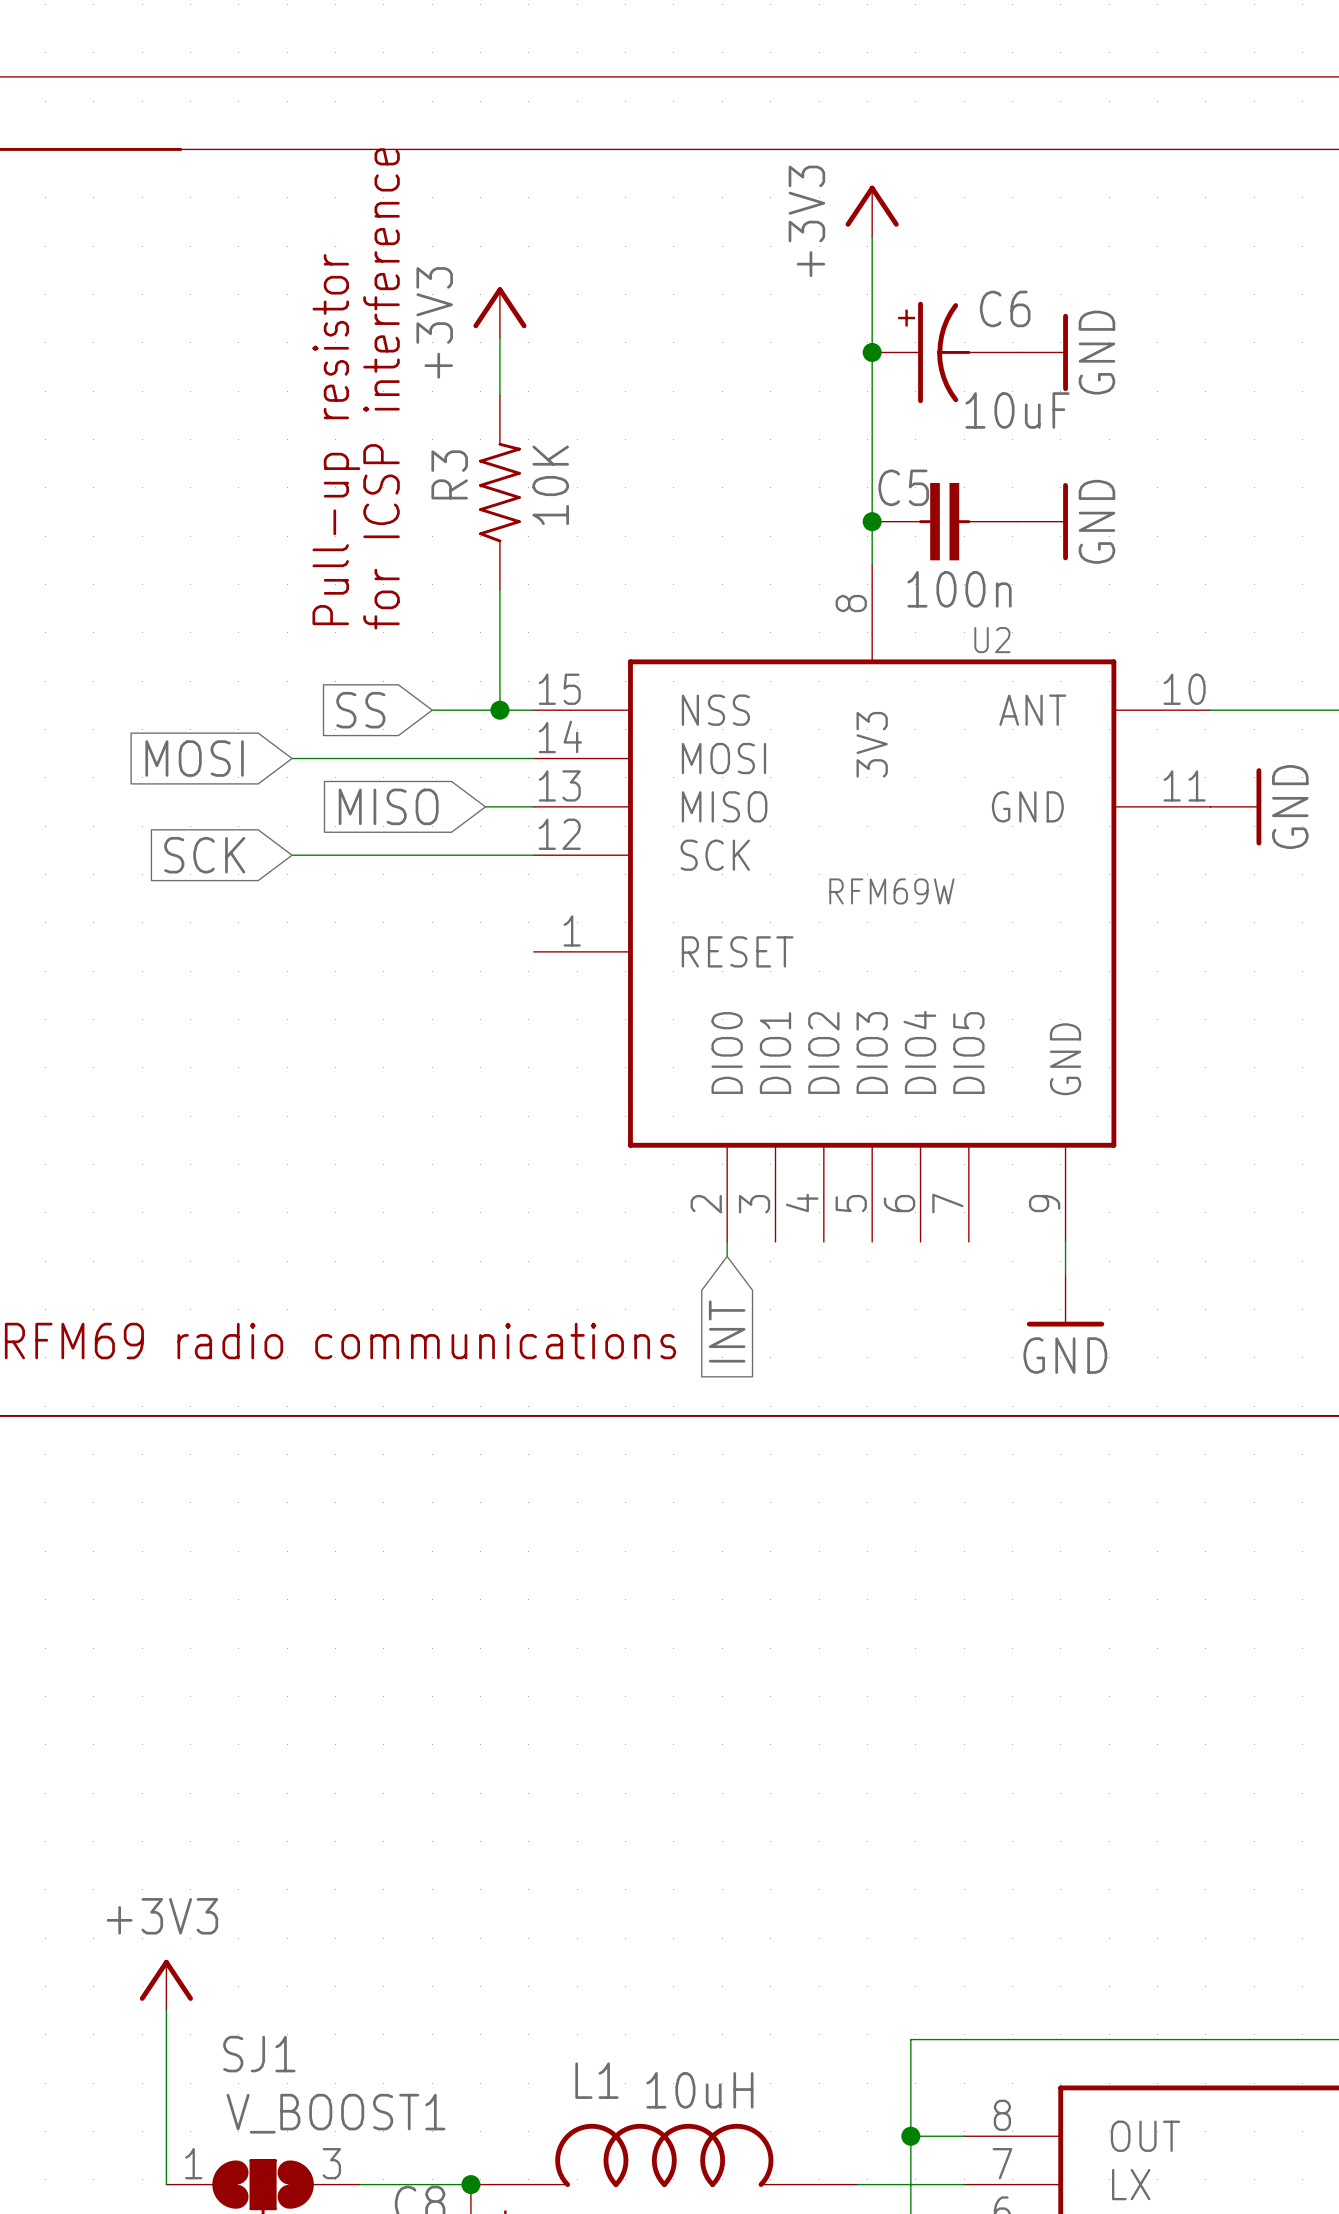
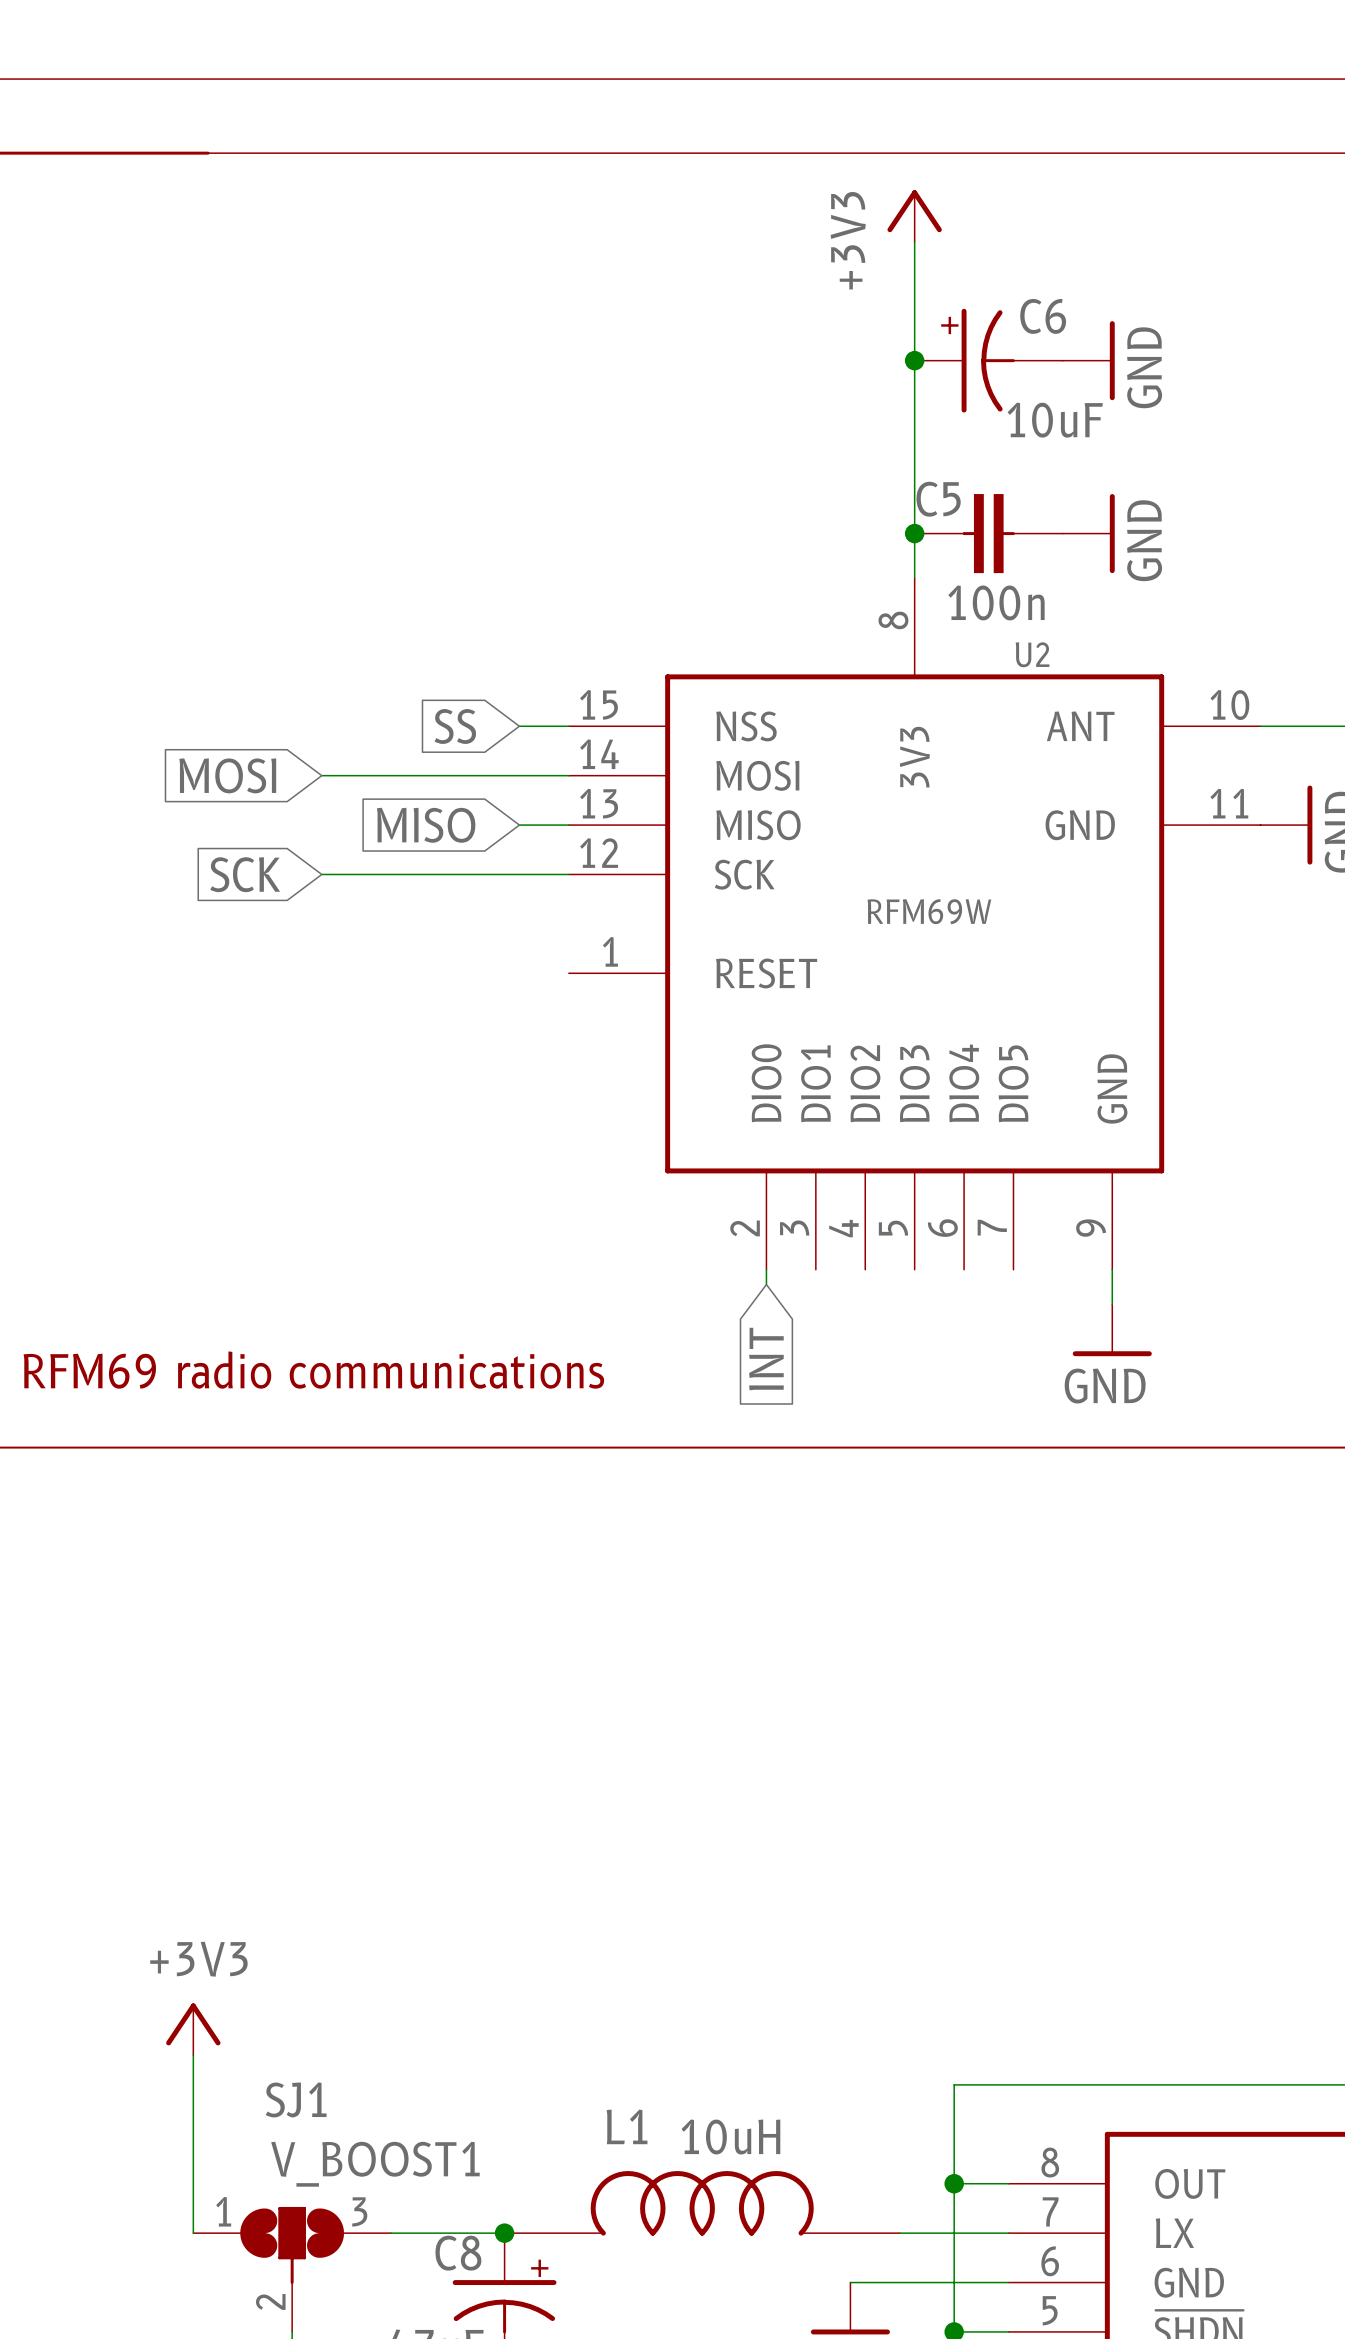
power symbol: +3V3 (499, 312) -> none
wire: (499, 337) (499, 395) -> none
text: for ICSP interference (381, 388) -> none
text: Pull-up resistor (336, 439) -> none
R3: 10K (499, 492) -> none
wire: (499, 589) (499, 710) -> none
global label position: SS (360, 710) -> SS (455, 726)
wire: (432, 710) (485, 710) -> none
junction: (499, 710) -> none

